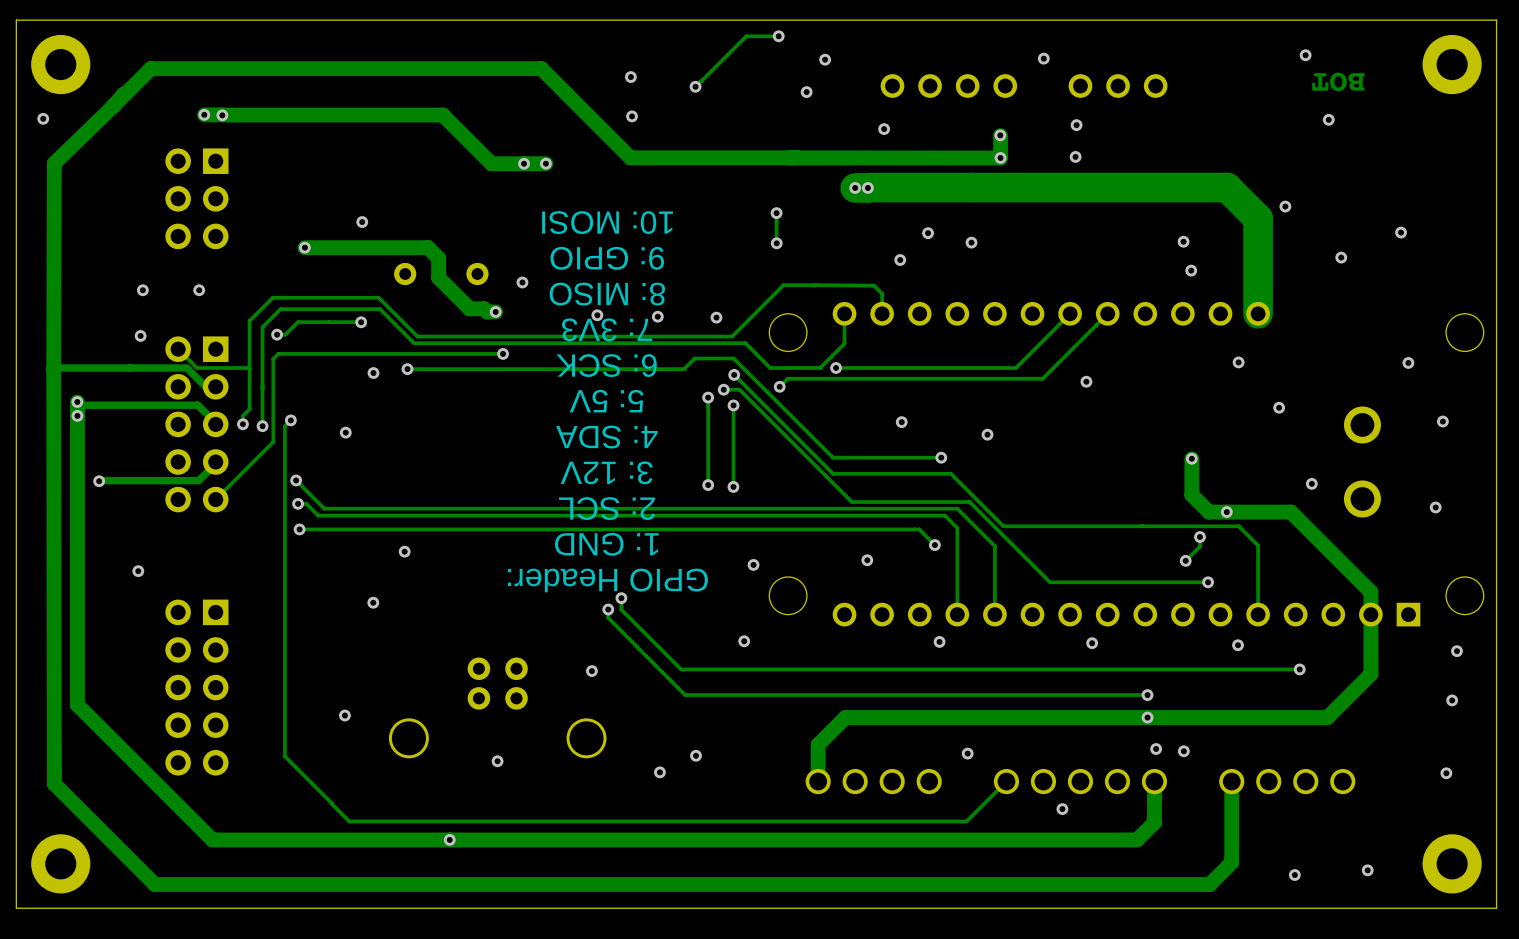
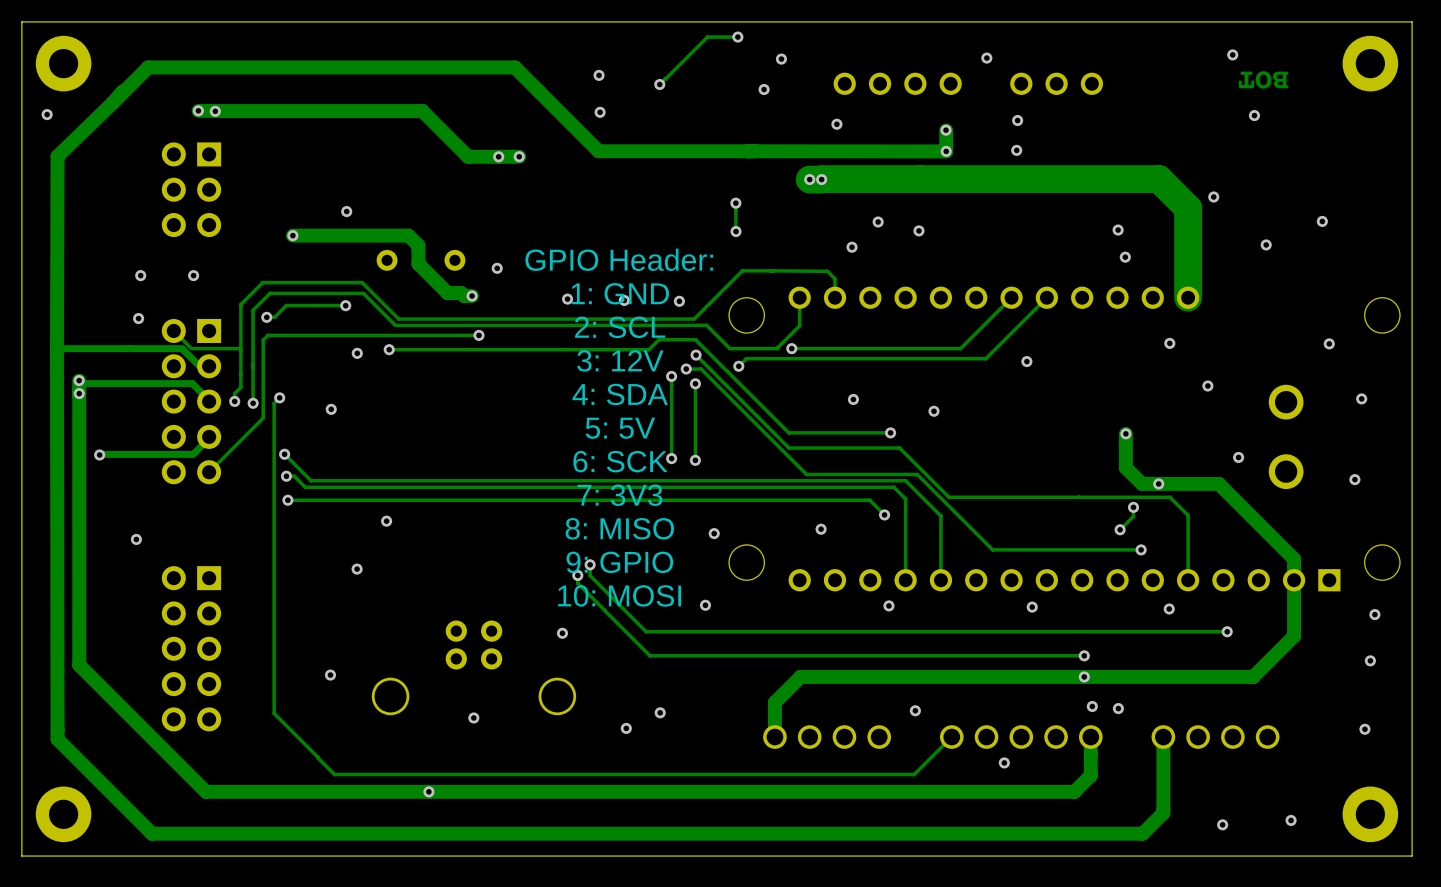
text: 10: MOSI (607, 222) -> none
text rotation: 0° (607, 258) -> 180° (619, 562)
text position: 9: GPIO (607, 258) -> 9: GPIO (619, 562)
text rotation: 0° (607, 294) -> 180° (619, 528)
text position: 8: MISO (607, 294) -> 8: MISO (619, 528)
text rotation: 0° (607, 329) -> 180° (619, 495)
text position: 7: 3V3 (607, 329) -> 7: 3V3 (619, 495)
text rotation: 0° (606, 365) -> 180° (620, 461)
text rotation: 0° (606, 401) -> 180° (620, 428)
text rotation: 0° (606, 437) -> 180° (620, 394)
text rotation: 0° (606, 472) -> 180° (620, 360)
text rotation: 0° (607, 508) -> 180° (620, 327)
text position: 2: SCL (607, 508) -> 2: SCL (620, 327)
text rotation: 0° (606, 544) -> 180° (620, 293)
text position: 1: GND (606, 544) -> 1: GND (620, 293)
text rotation: 0° (607, 580) -> 180° (619, 259)
text position: GPIO Header: (607, 580) -> GPIO Header: (619, 259)
text: none -> 10: MOSI (619, 595)

